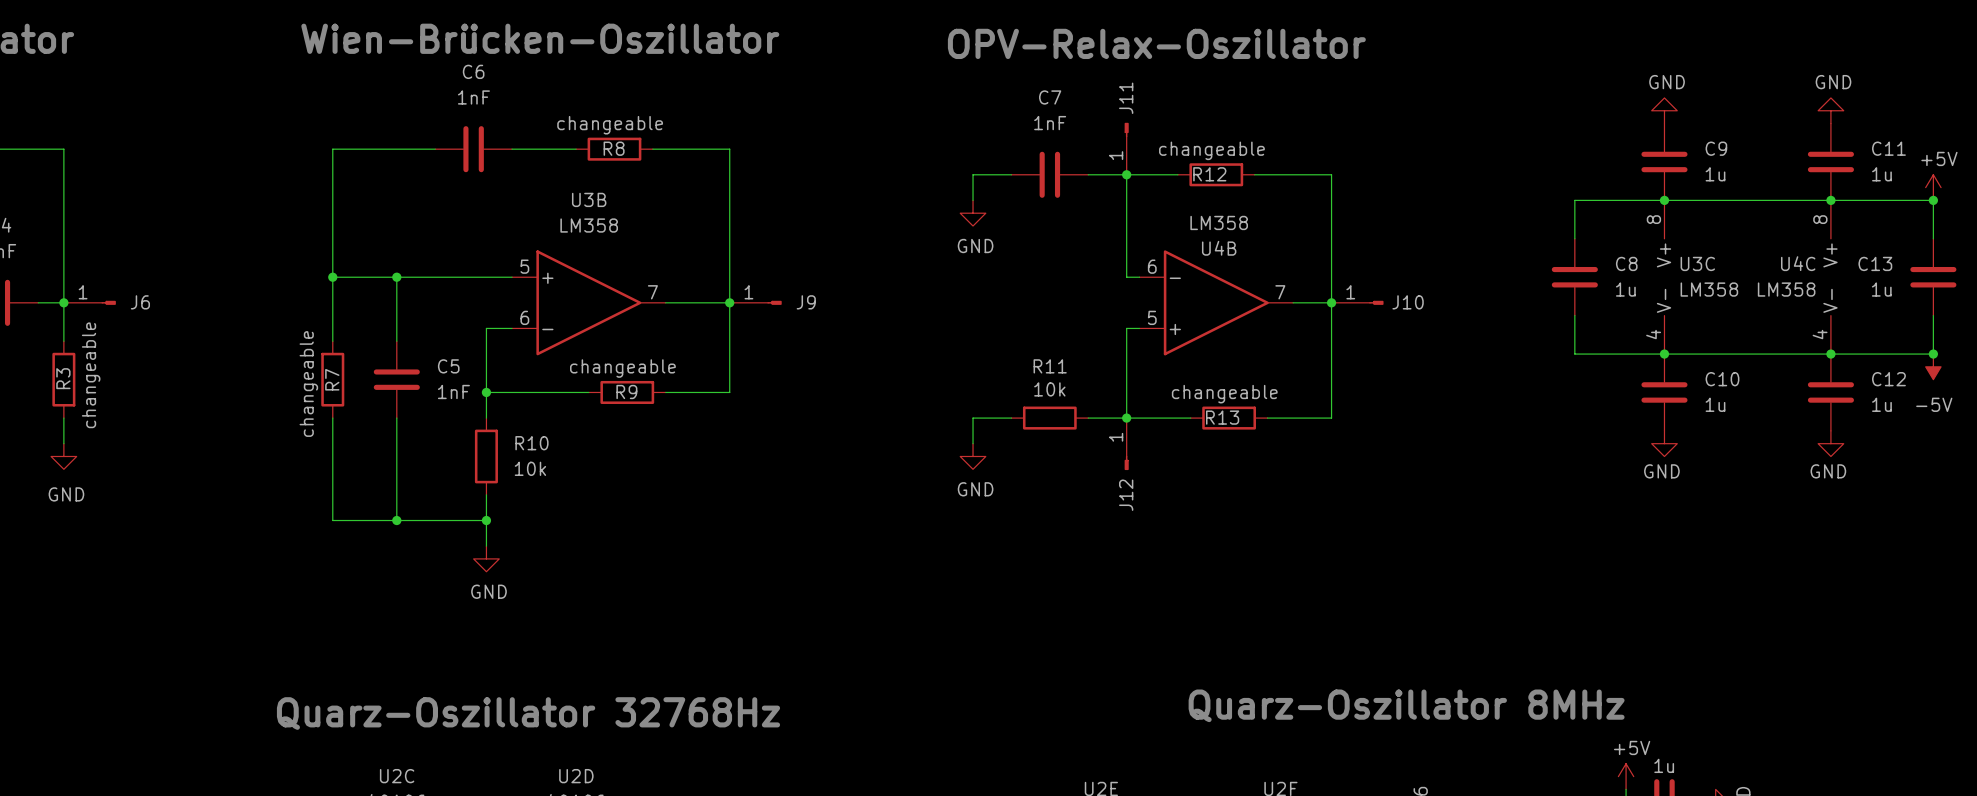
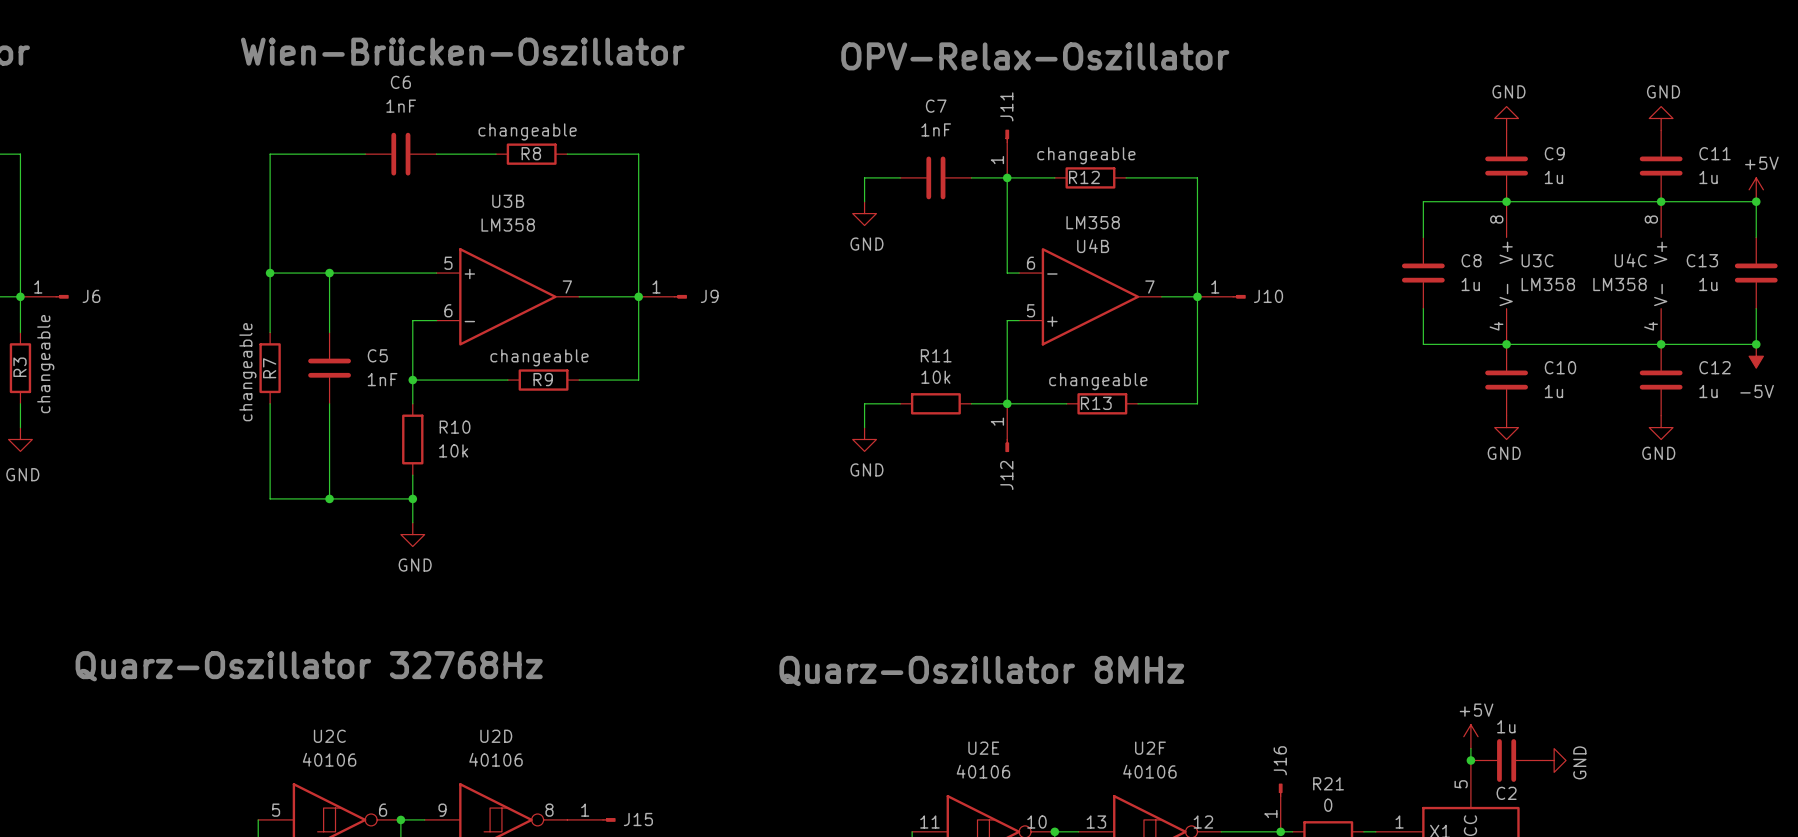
text: none -> Quarz-Oszillator 8MHz (981, 670)
text: Quarz-Oszillator 8MHz (1406, 705) -> none
text position: Quarz-Oszillator 32768Hz (528, 713) -> Quarz-Oszillator 32768Hz (309, 666)

